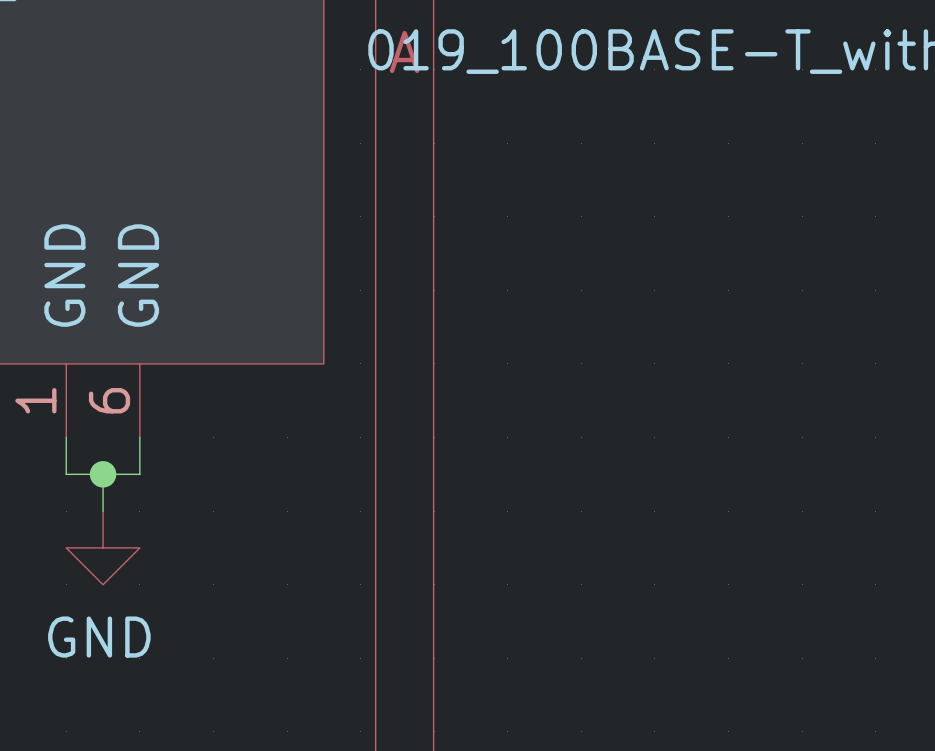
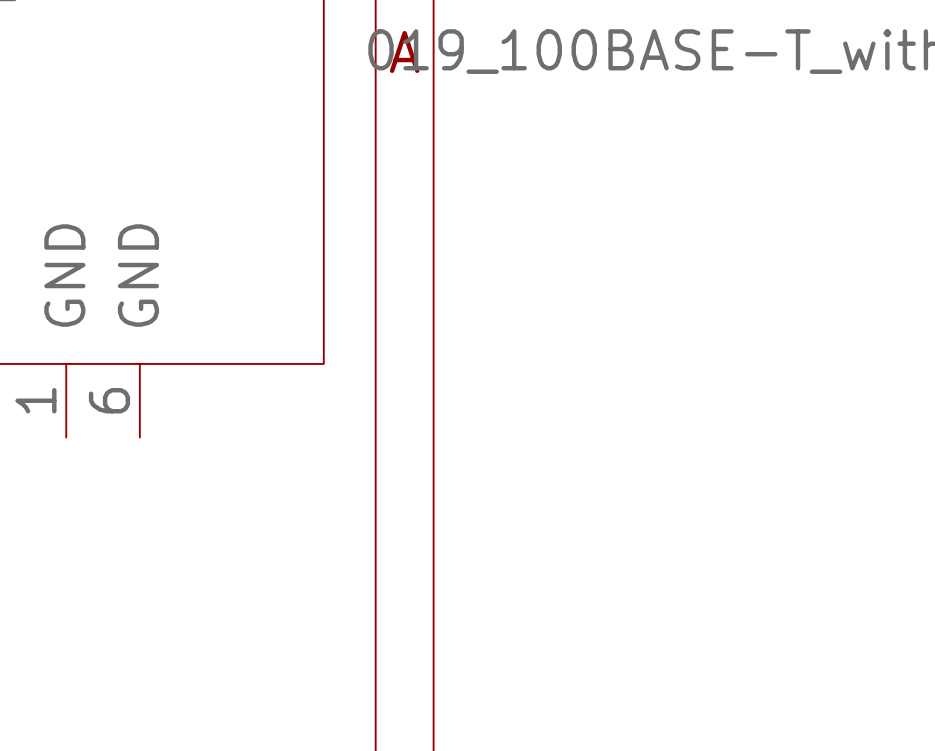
wire: (66, 437) (66, 474) (139, 474) (139, 437) -> none
wire: (103, 474) (103, 511) -> none
junction: (103, 474) -> none
power symbol: GND (103, 547) -> none

